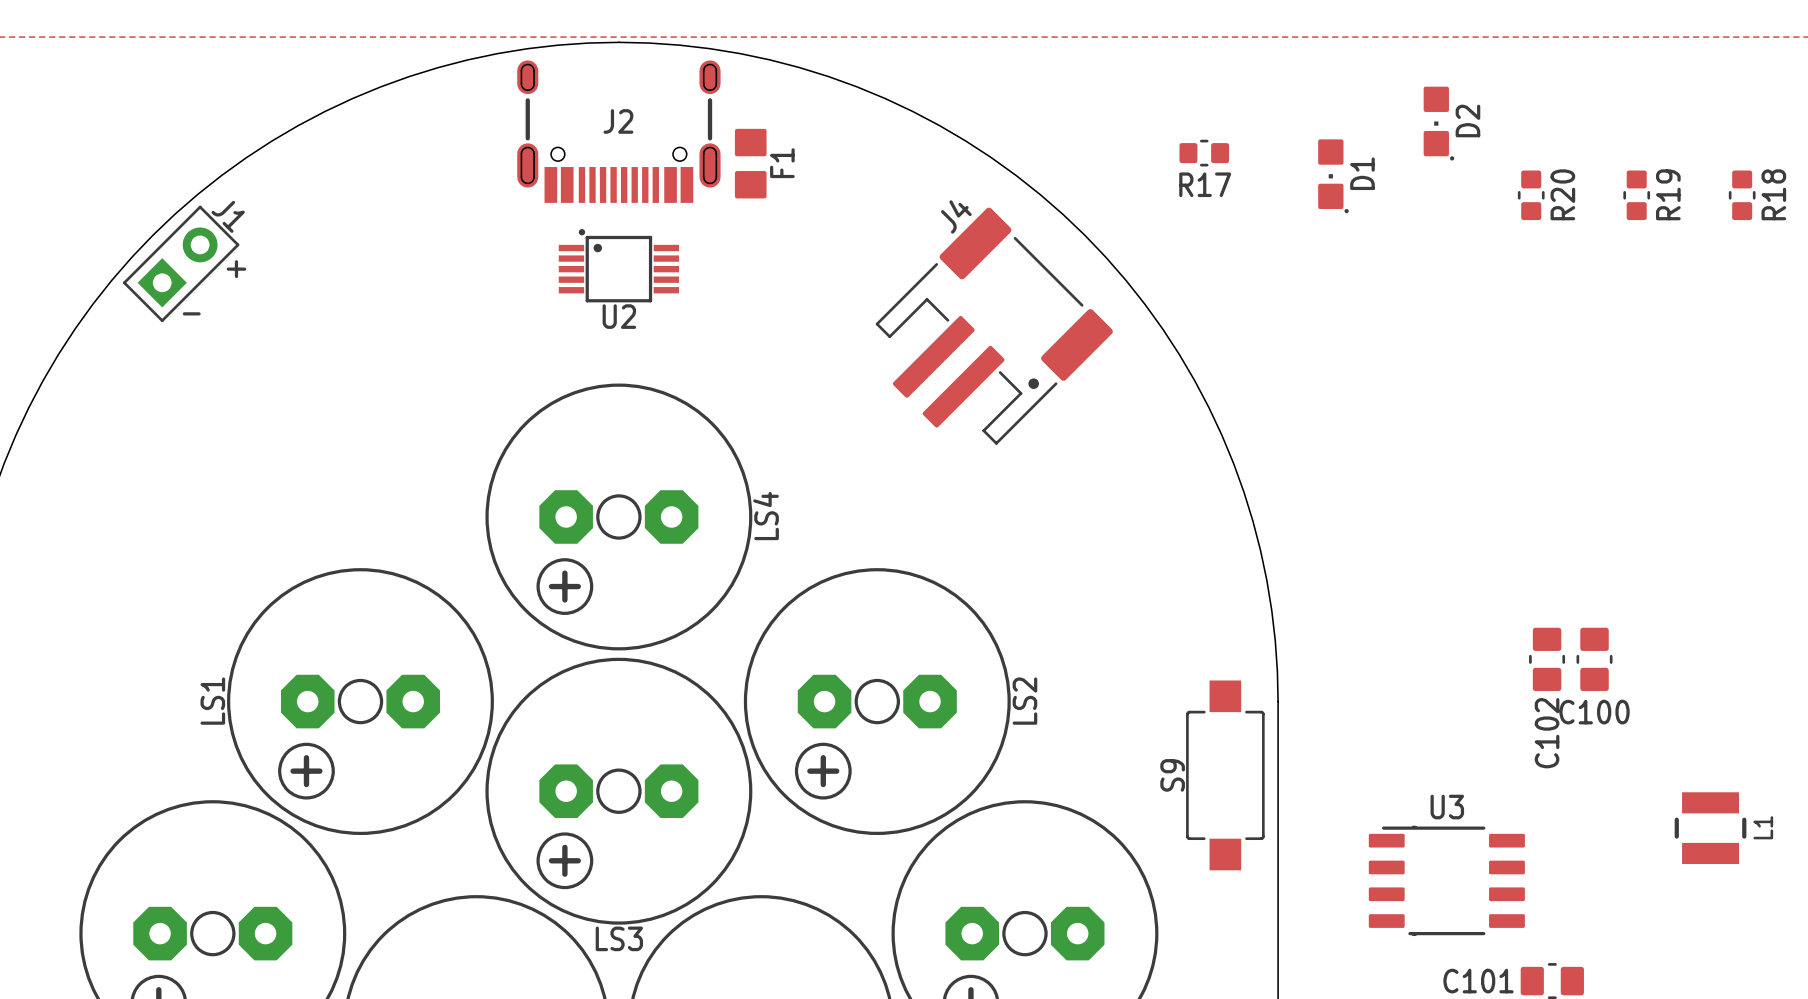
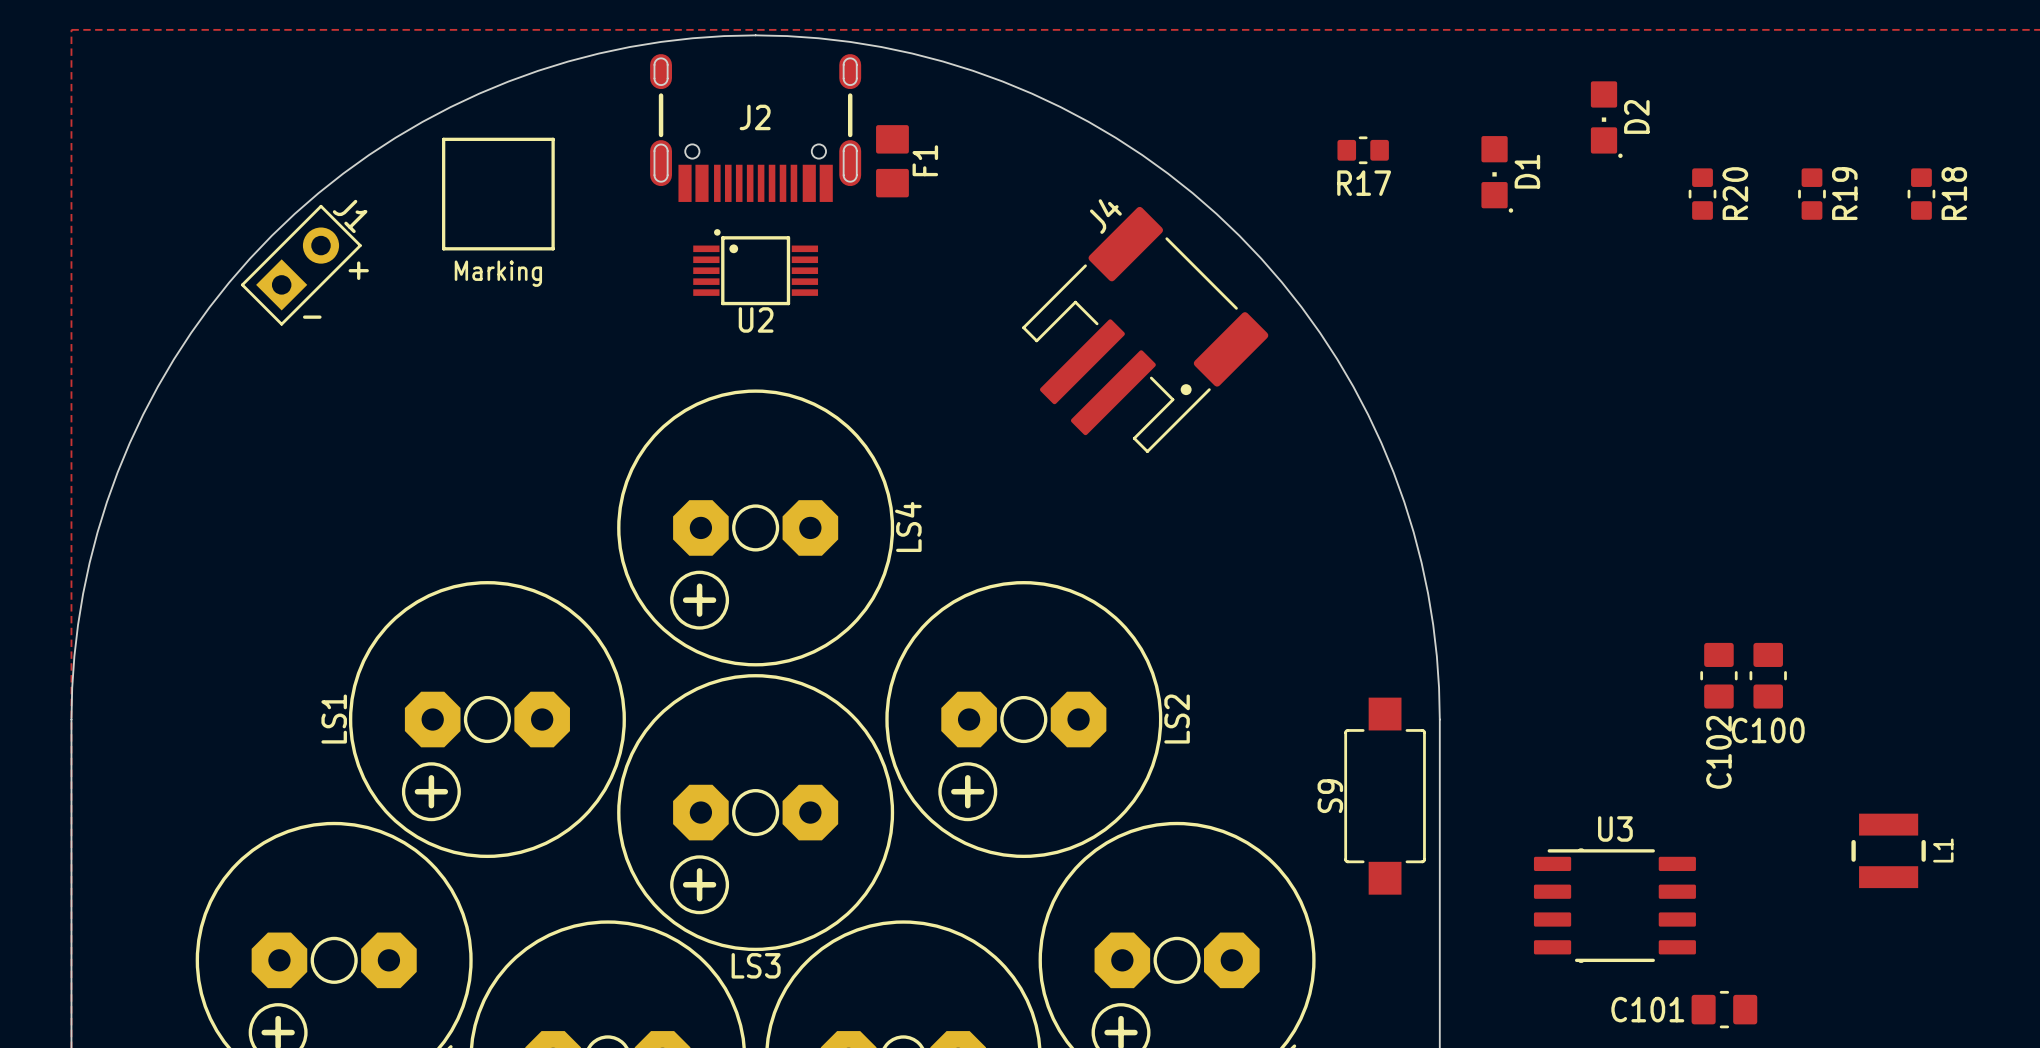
drawing: none -> [442, 137, 555, 251]

